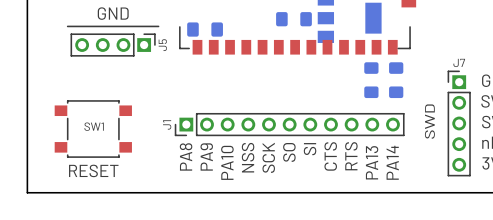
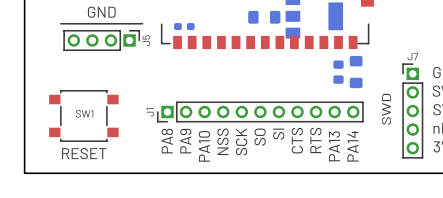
part footprint: [187, 22, 223, 37] -> [174, 23, 195, 31]
part footprint: [364, 62, 379, 99] -> [333, 60, 344, 84]

